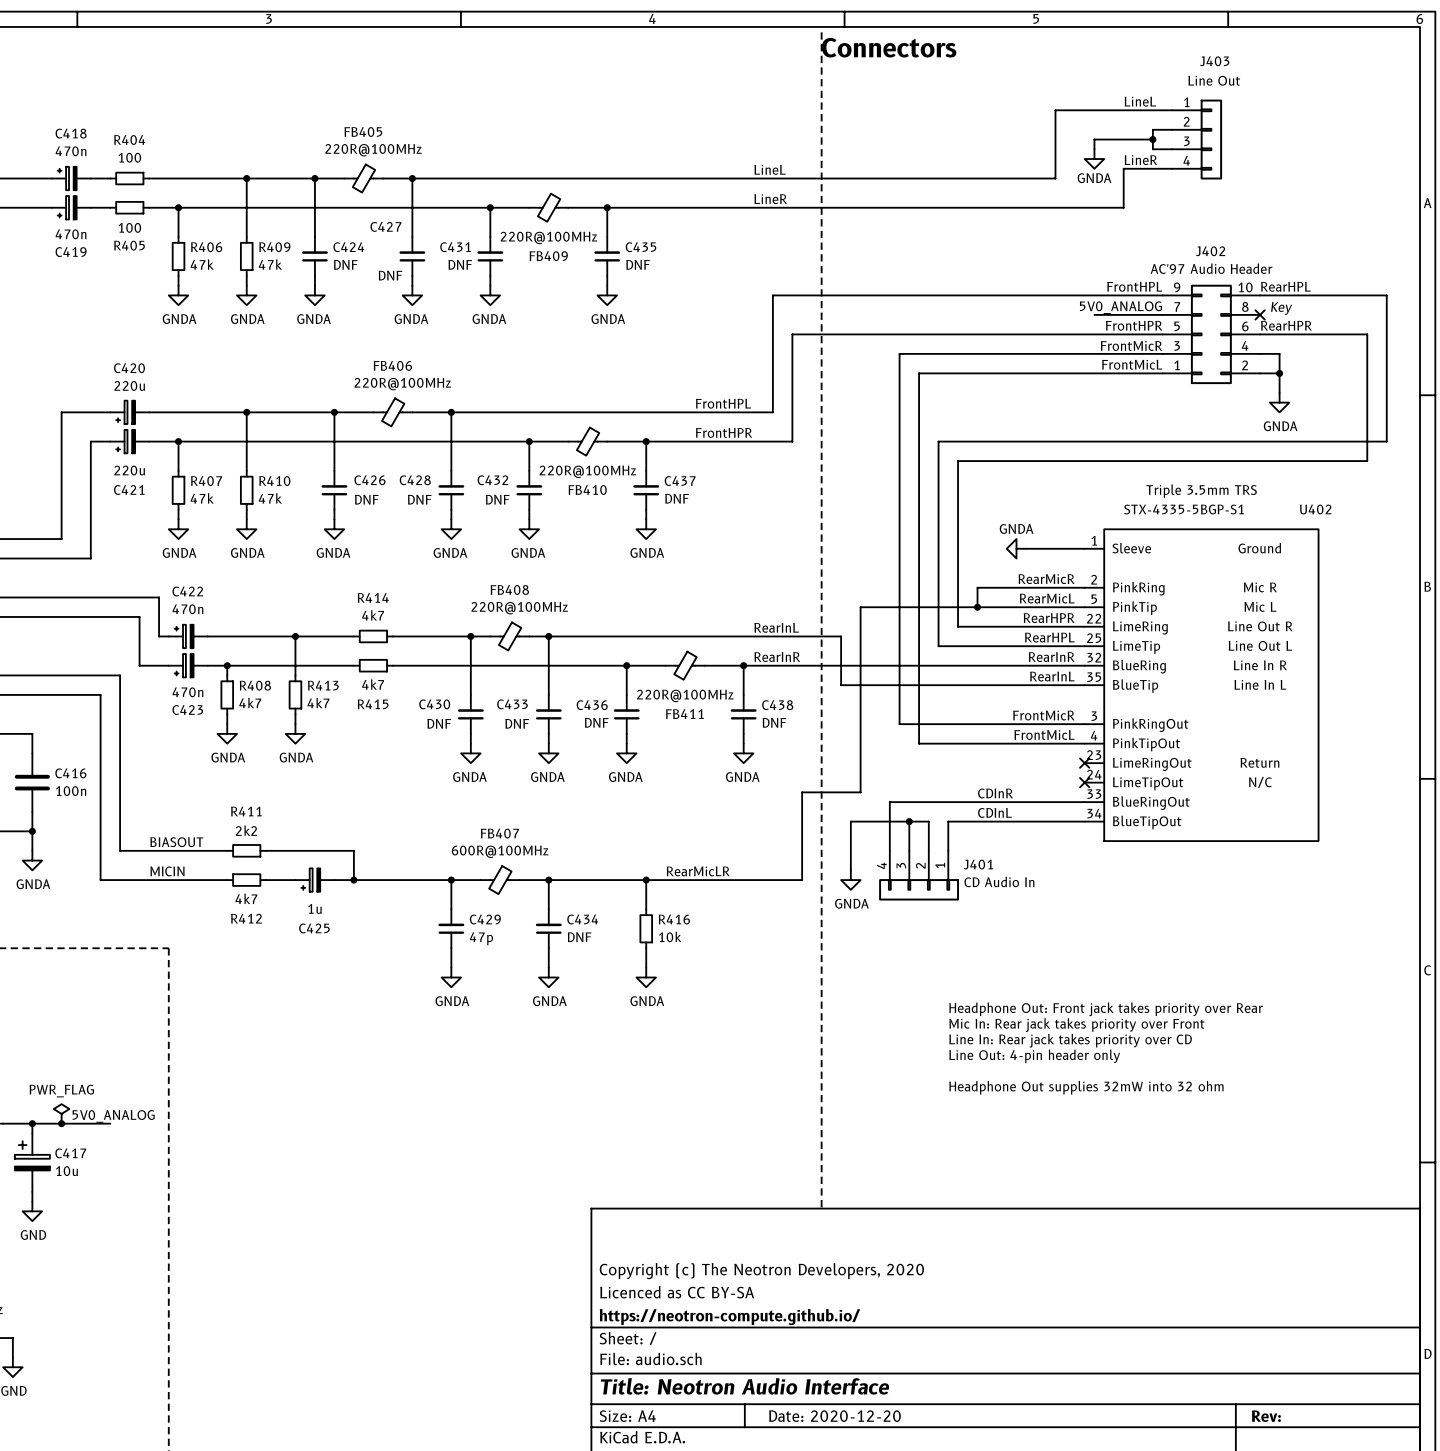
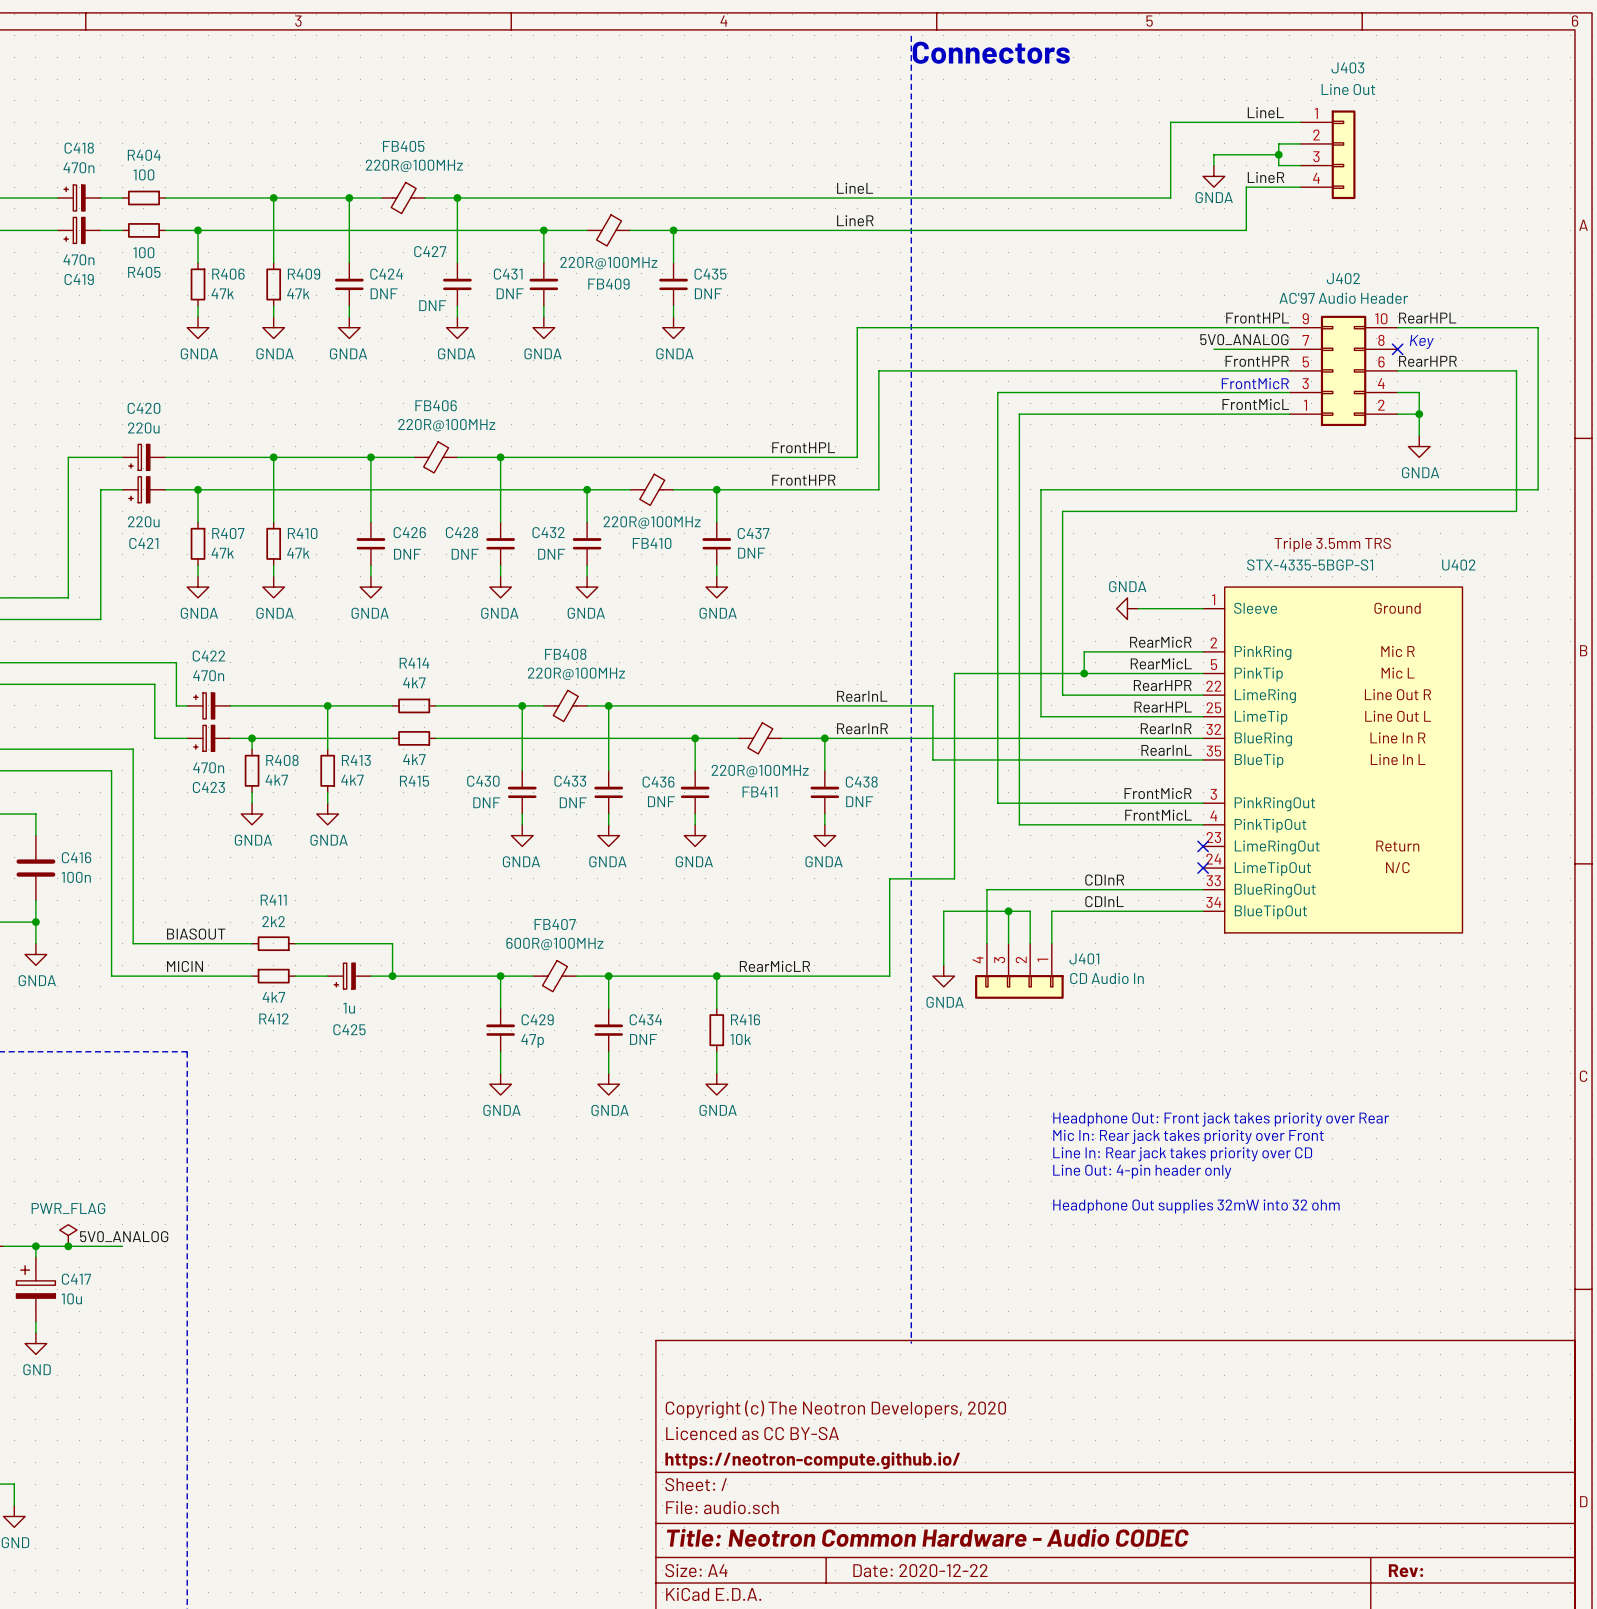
title block: Title: Neotron Audio Interface (744, 1386) -> Title: Neotron Common Hardware - Audio CODEC (927, 1537)
title block: Date: 2020-12-20 (834, 1416) -> Date: 2020-12-22 (920, 1570)

